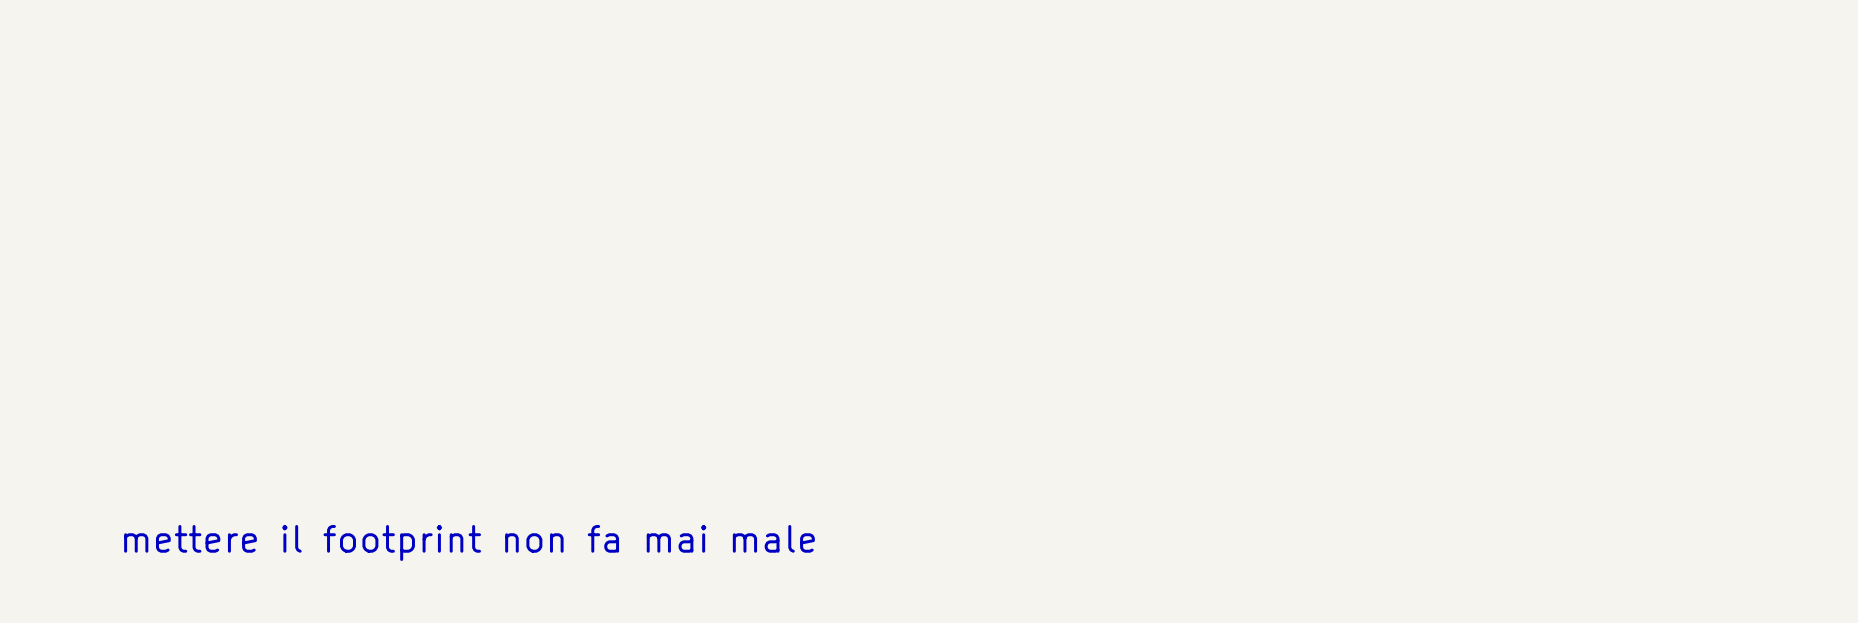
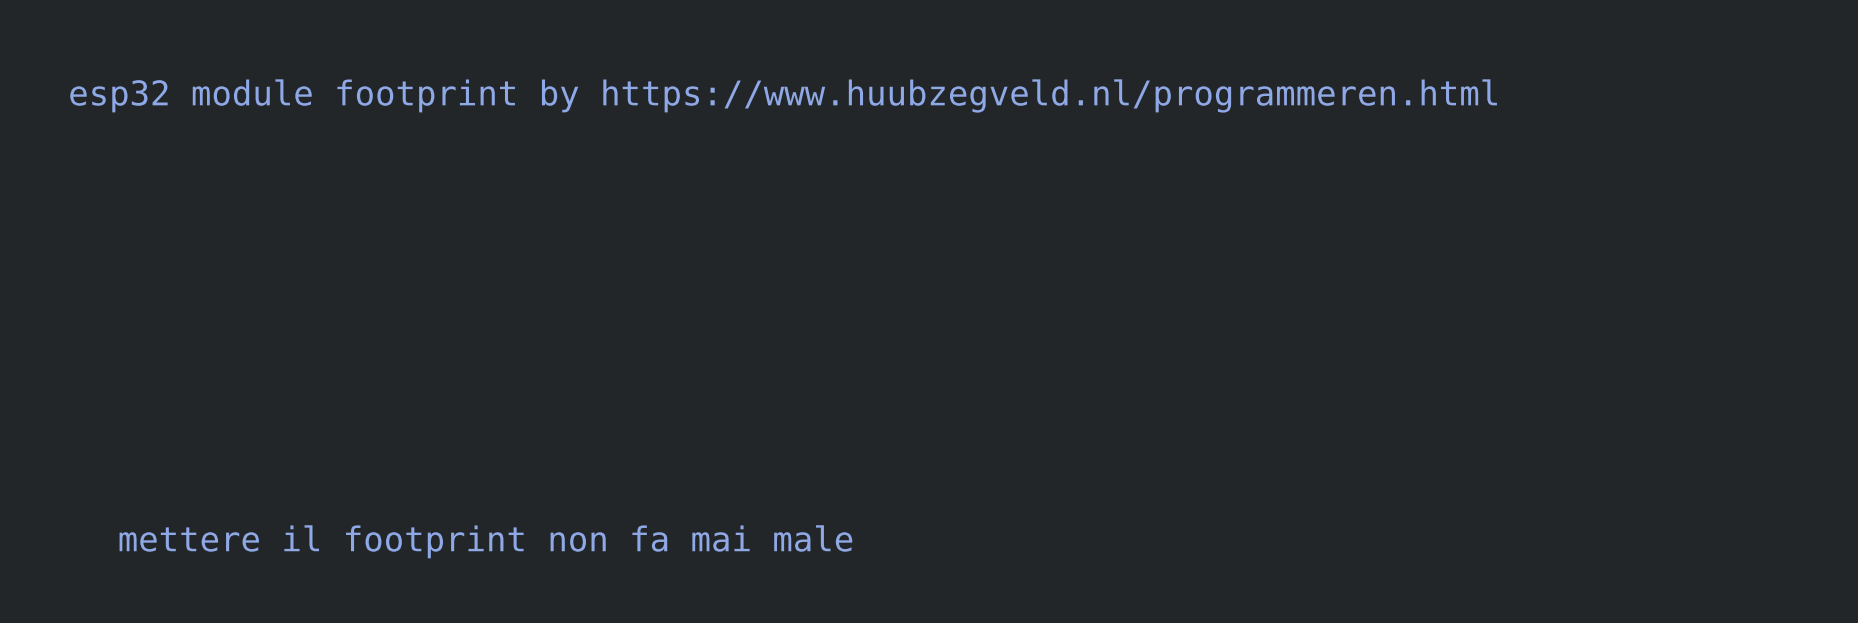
text: none -> esp32 module footprint by https://www.huubzegveld.nl/programmeren.html (783, 95)

